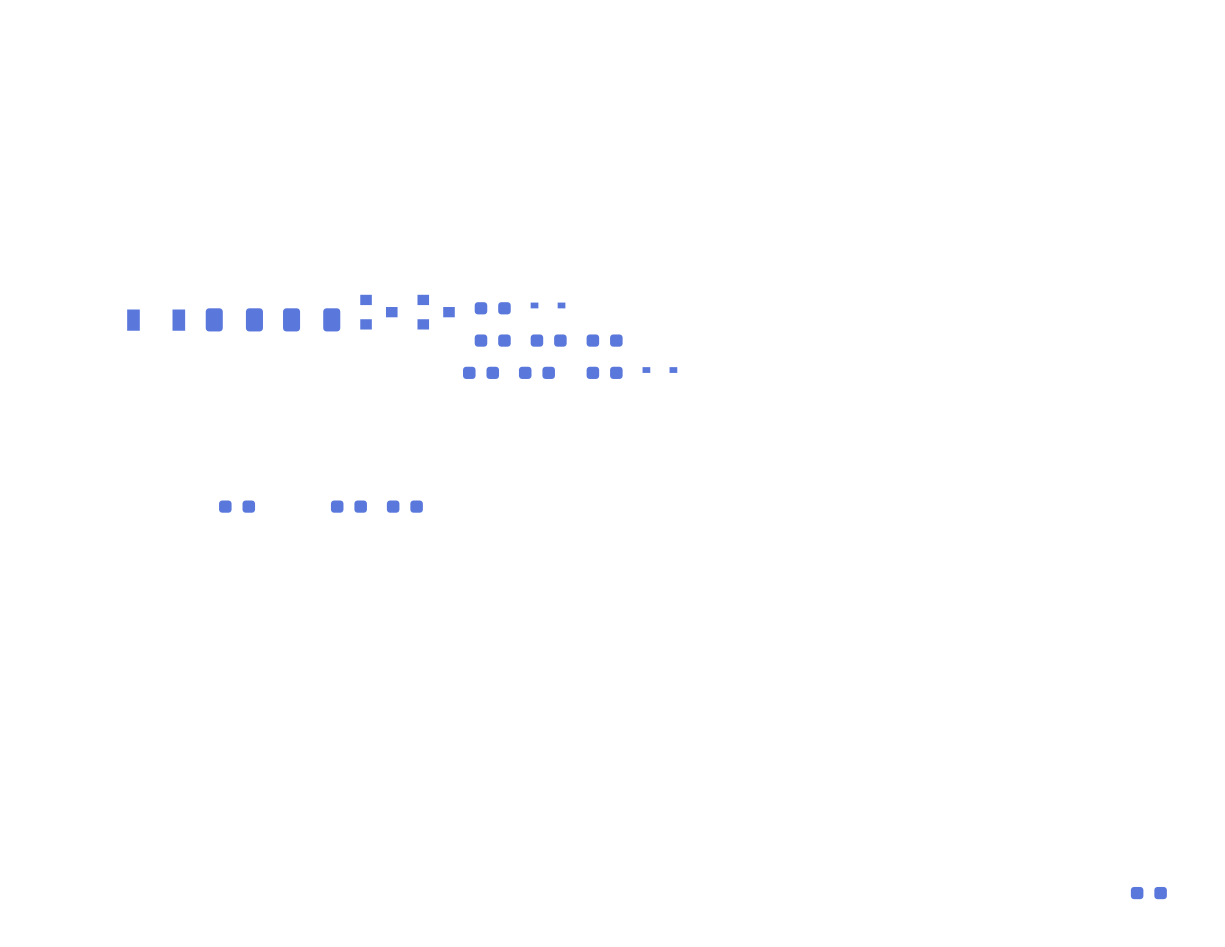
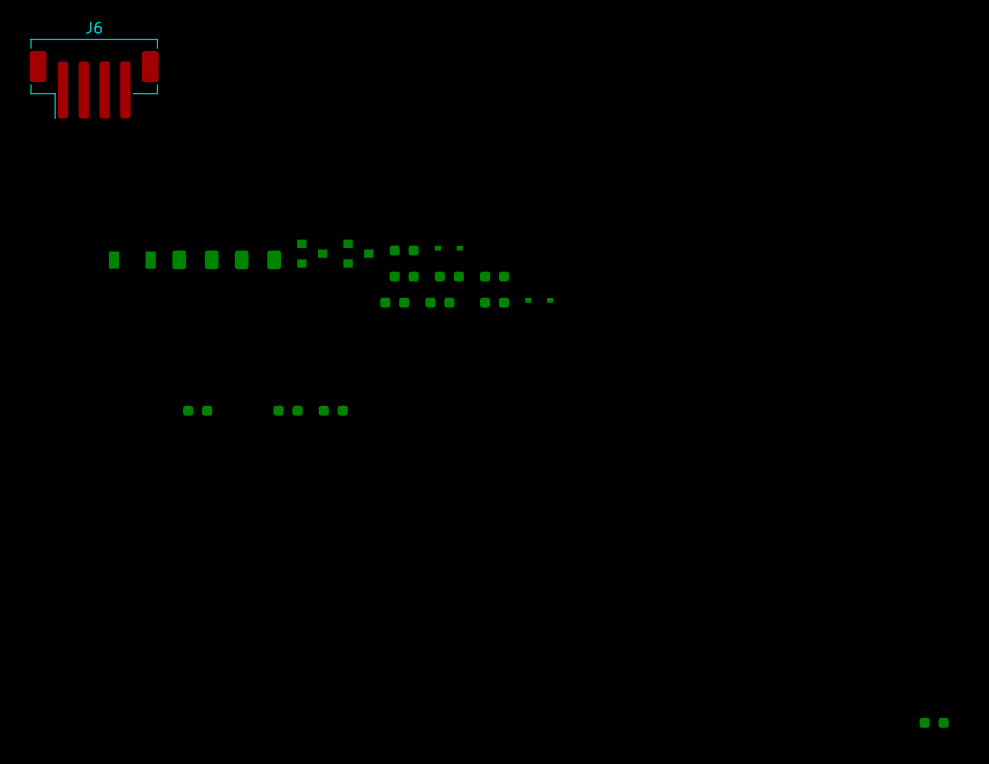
J6: none -> (94, 78)

